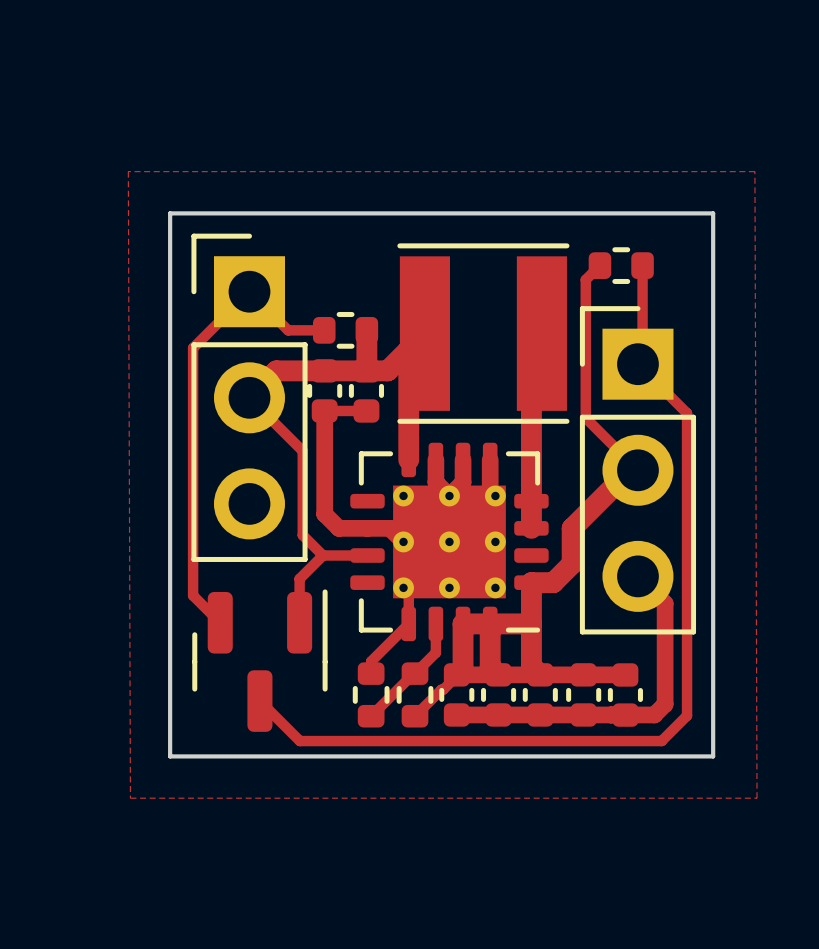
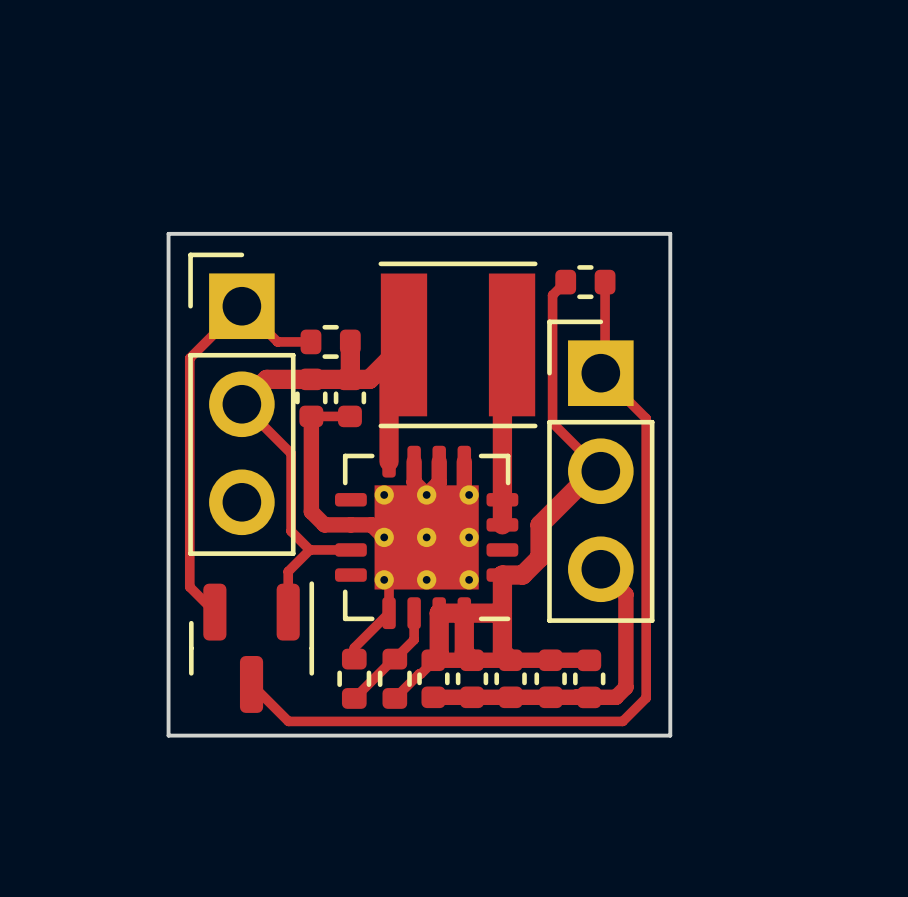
zone outline: (128, 171) (130, 798) (757, 798) (754, 171) (128, 171) -> none

